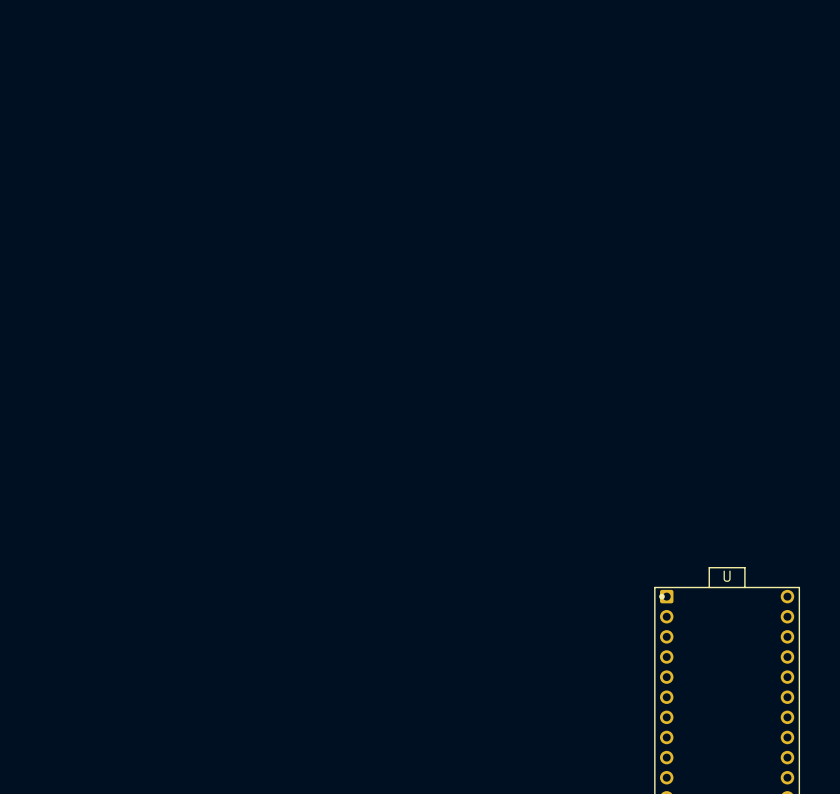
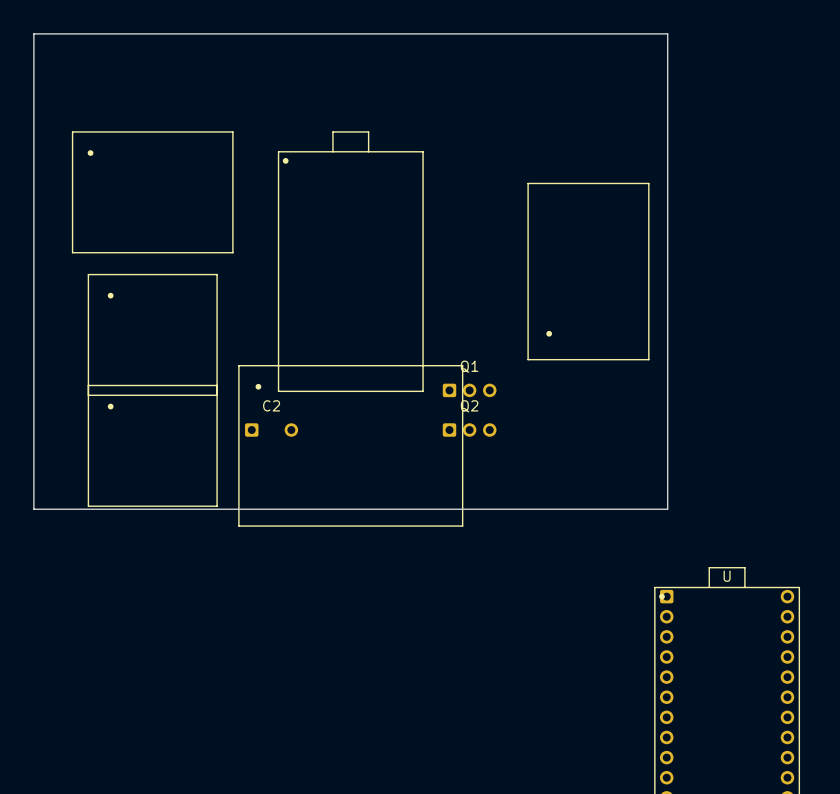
board edge: none -> (33, 33) (667, 33) (667, 509) (33, 509) (33, 33)
drawing: none -> [72, 131, 234, 254]
drawing: none -> [238, 131, 464, 527]
drawing: none -> [527, 182, 650, 361]
drawing: none -> [87, 274, 218, 507]
Q1: none -> (469, 390)
C2: none -> (271, 430)
Q2: none -> (469, 430)

